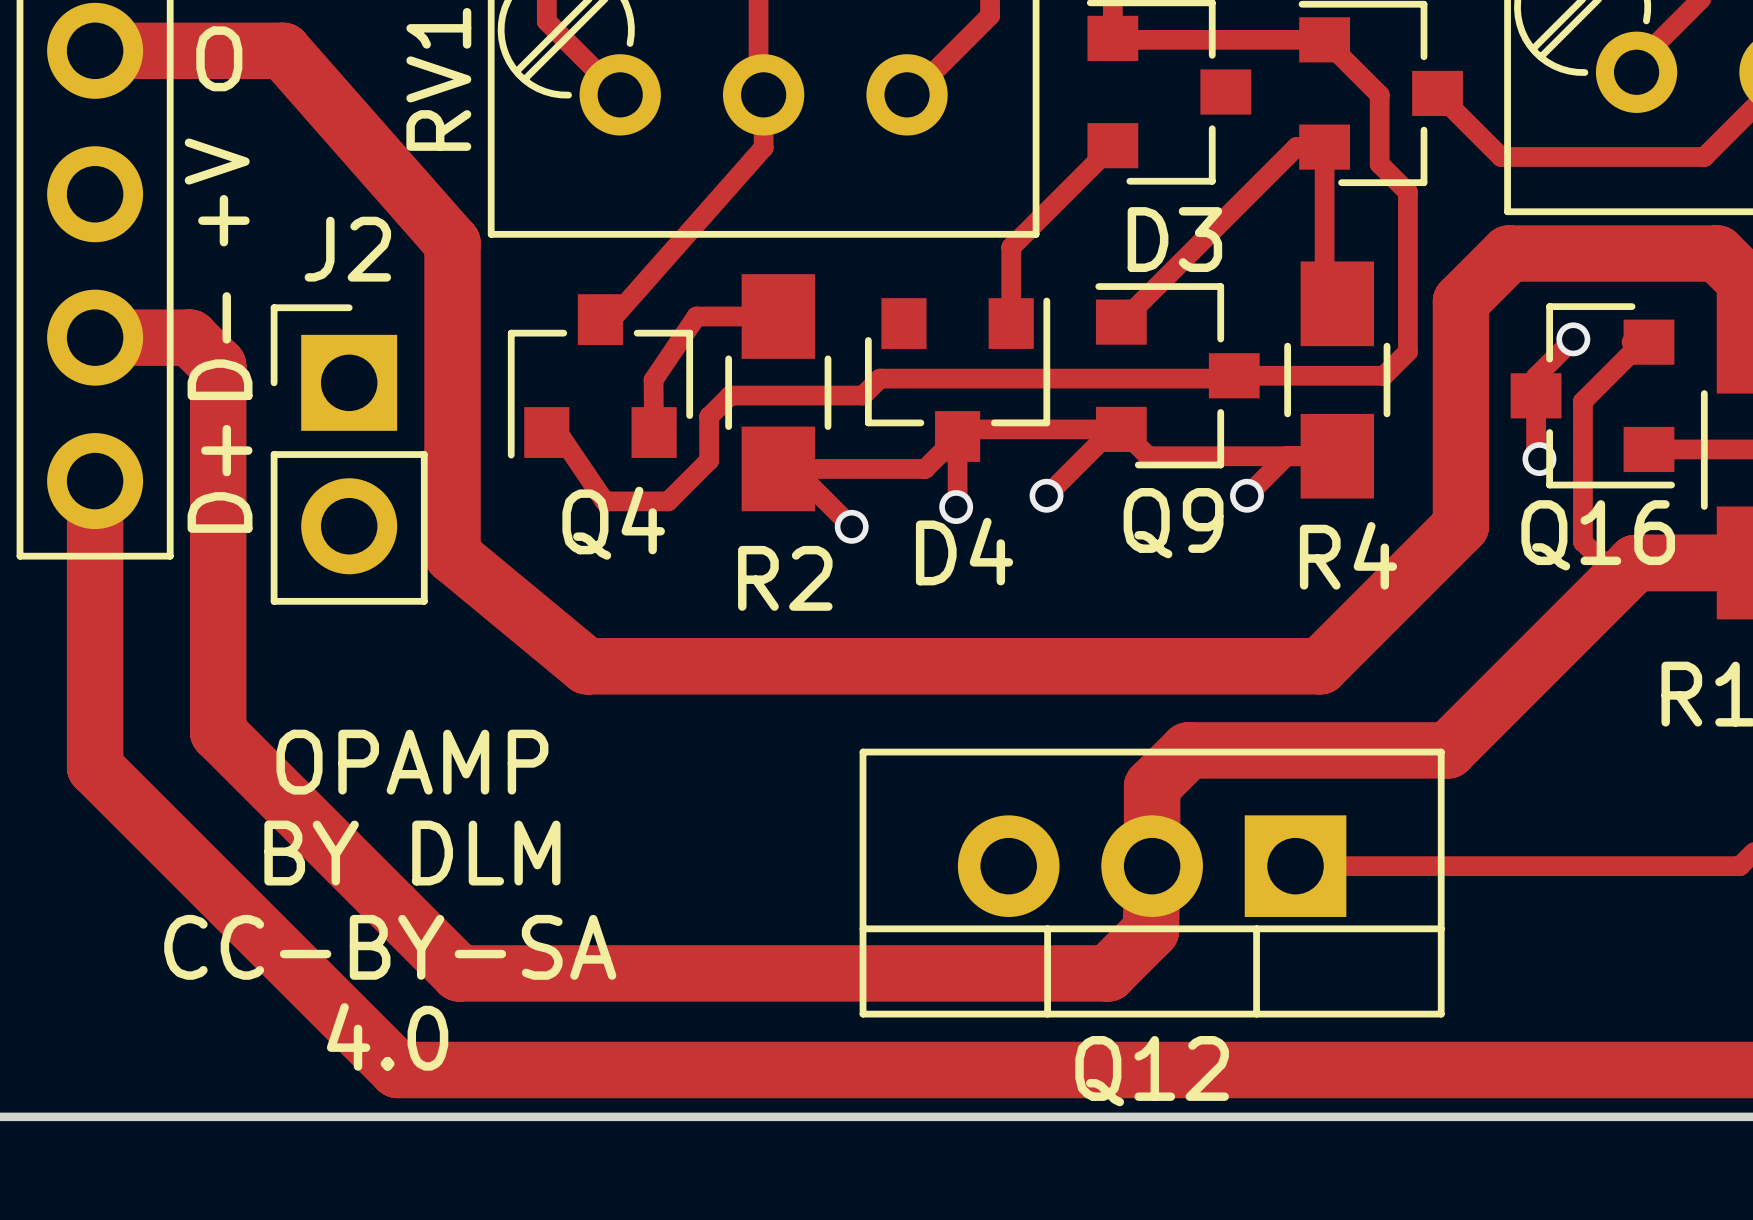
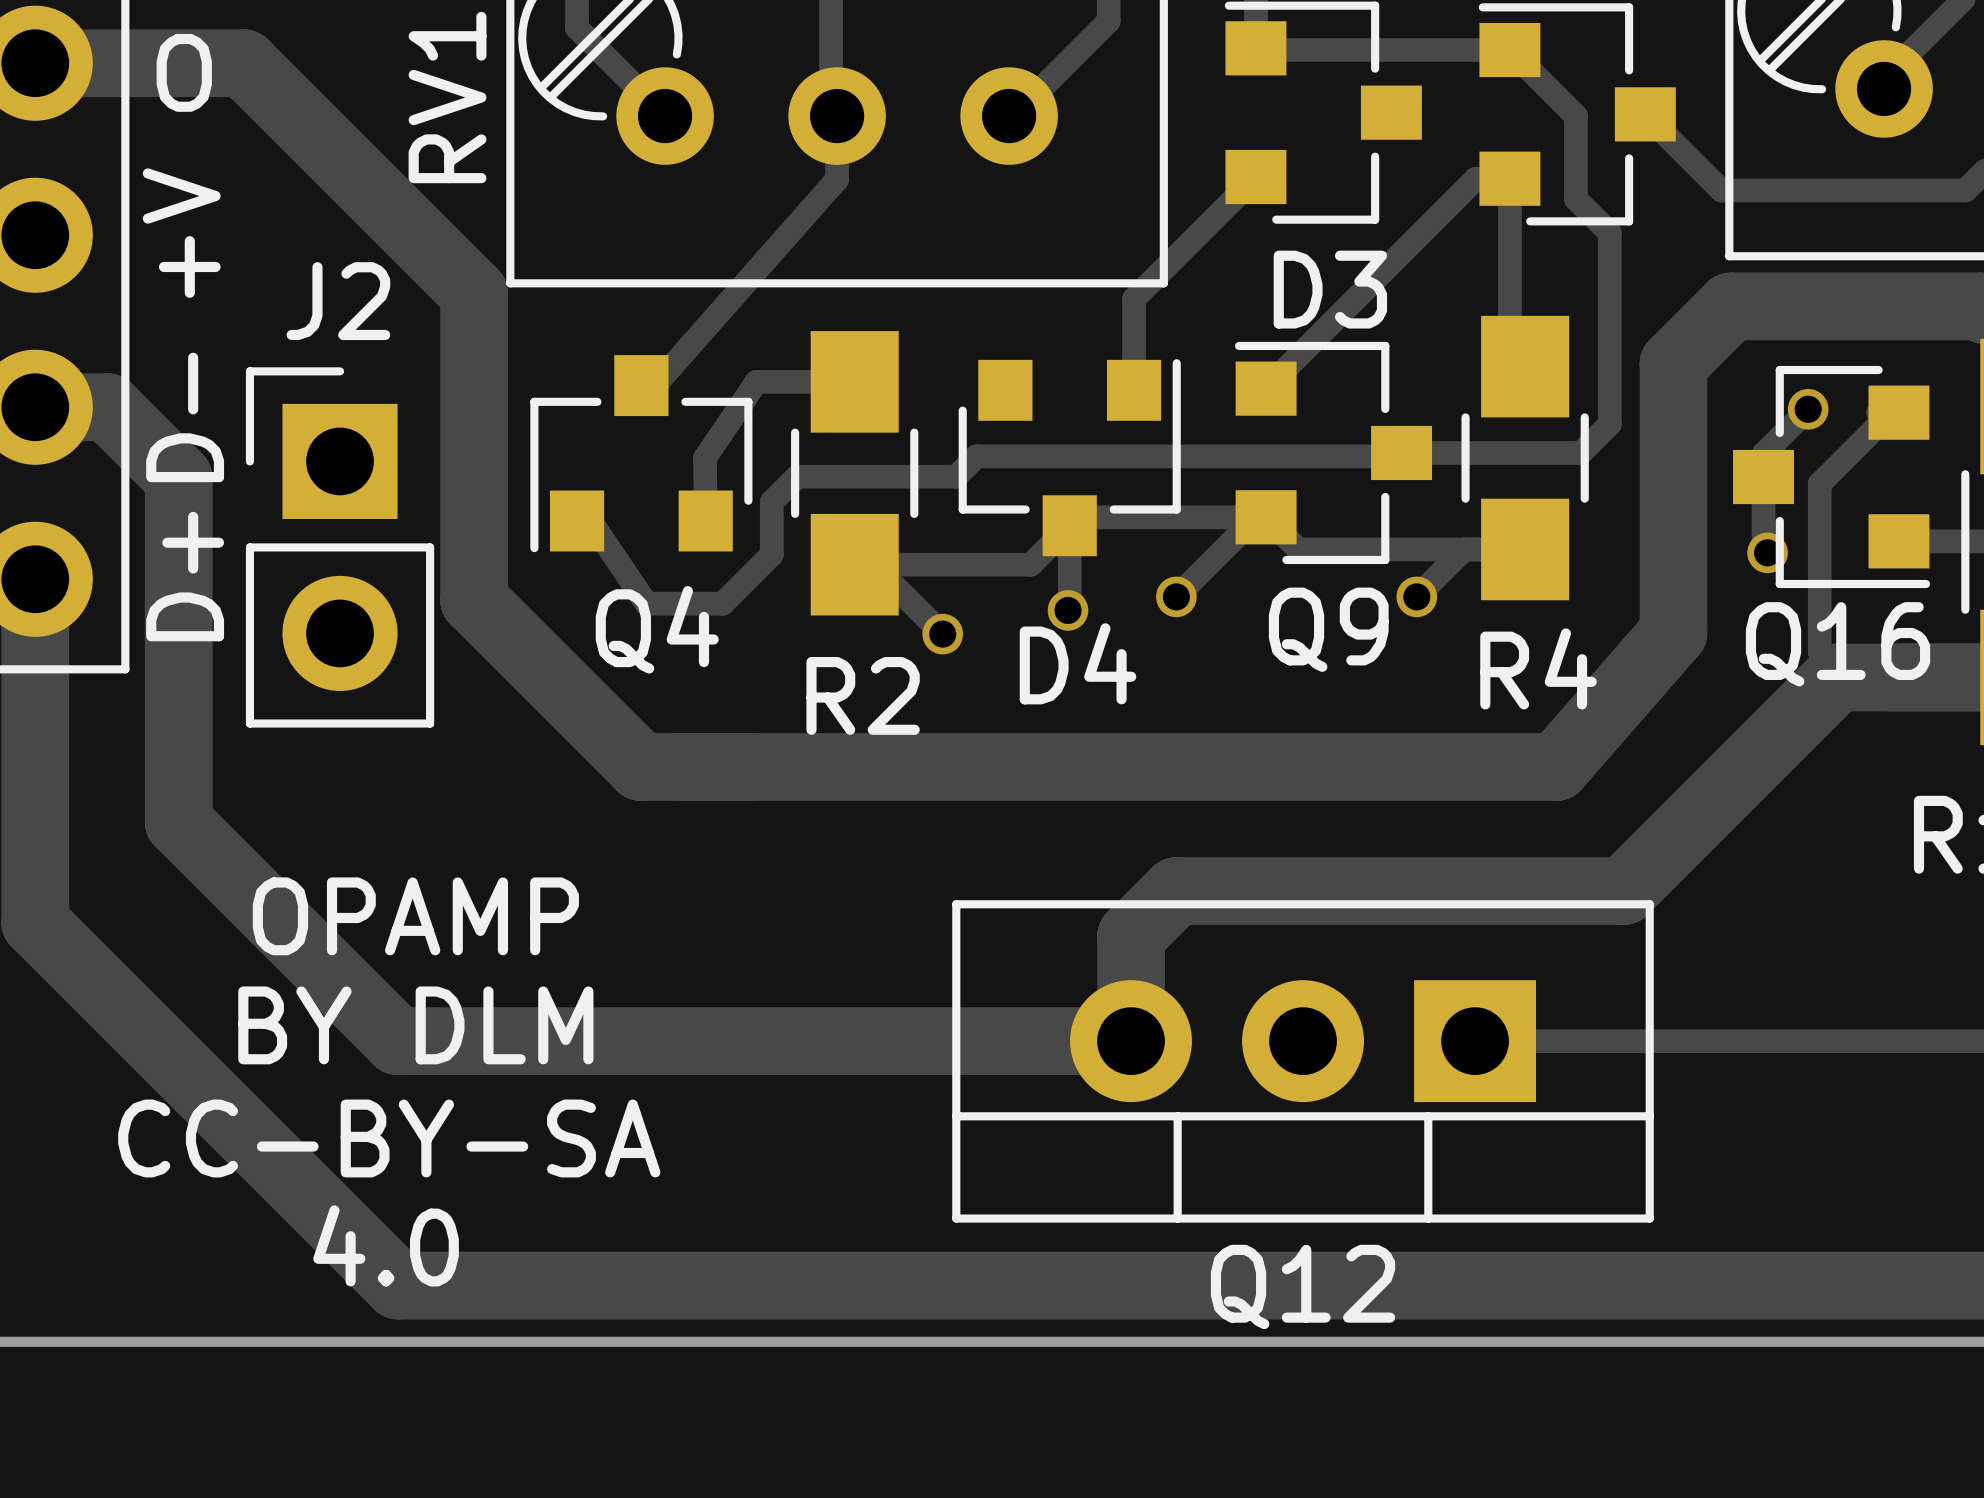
track: (269, 50) (283, 50) (452, 243) (452, 555) (586, 666) (1320, 666) (1460, 525) -> (243, 63) (474, 293) (474, 600) (640, 766) (1556, 766) (1673, 632)
track: (155, 337) (189, 337) (218, 365) (218, 732) (459, 973) (1108, 973) (1150, 930) (1152, 786) (1188, 750) (1447, 750) (1635, 562) -> (107, 407) (178, 478) (178, 822) (397, 1041) (1131, 1041) (1131, 936) (1176, 891) (1623, 891) (1837, 677) (1882, 677)

